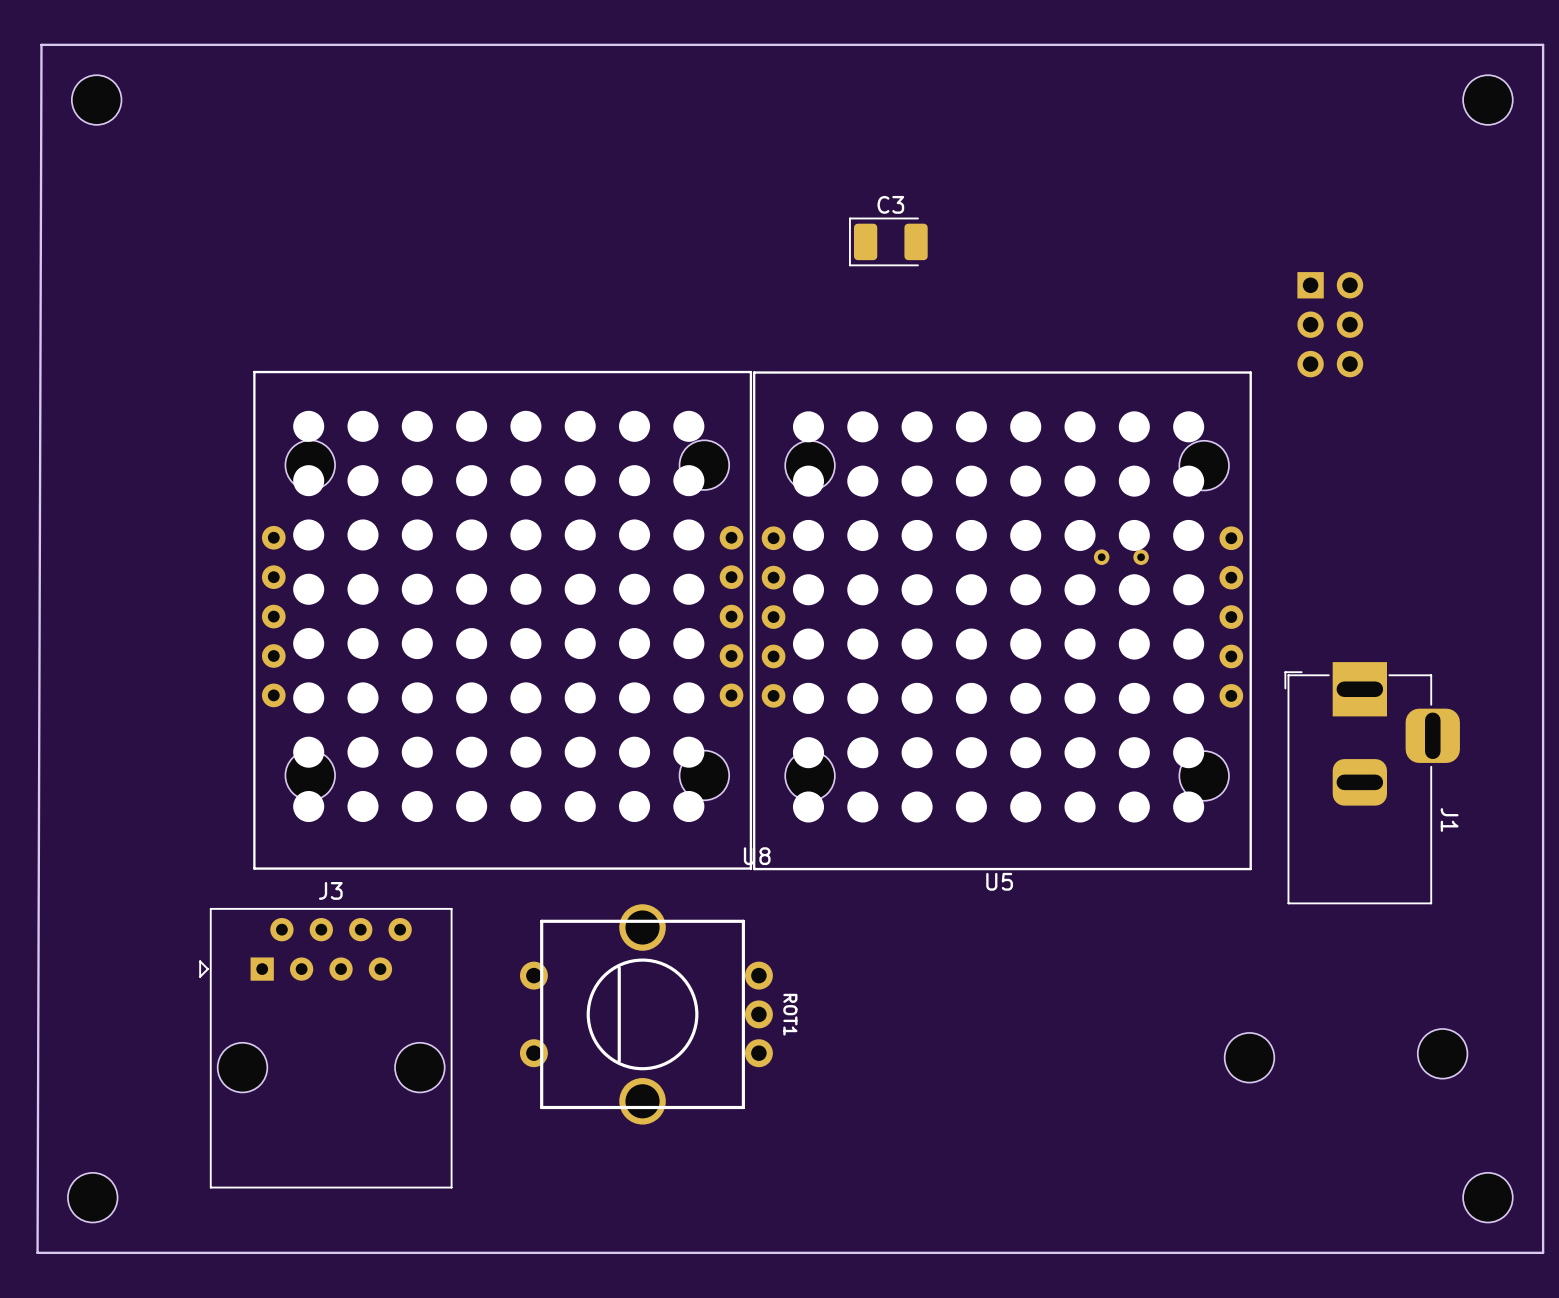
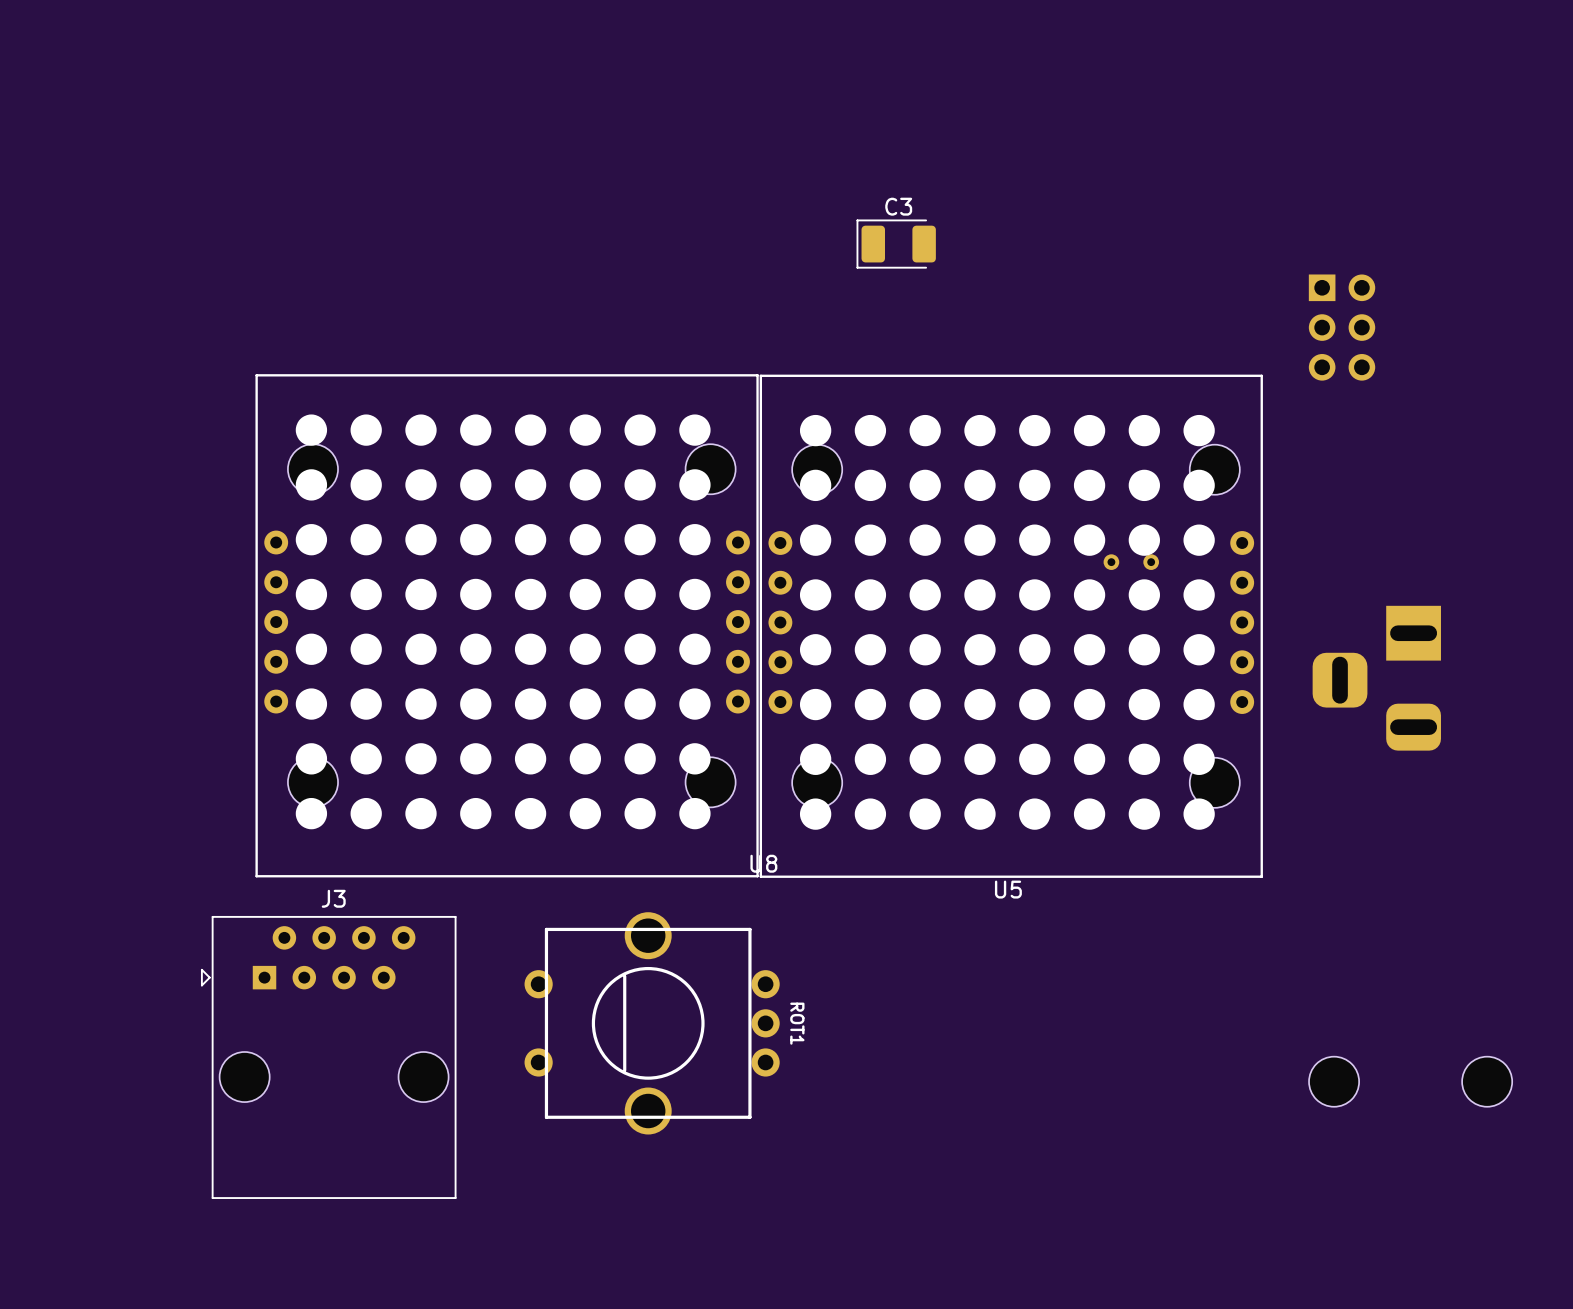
board edge: (1543, 44) (1543, 1252) (37, 1252) (41, 44) (1543, 44) -> none
part: (96, 100) -> none
part: (1487, 100) -> none
J1 side: bottom (1372, 783) -> top (1376, 678)
part position: (1442, 1053) -> (1487, 1081)
part: (1249, 1057) -> none
part: none -> (1334, 1081)
part: (92, 1197) -> none
part: (1487, 1197) -> none

